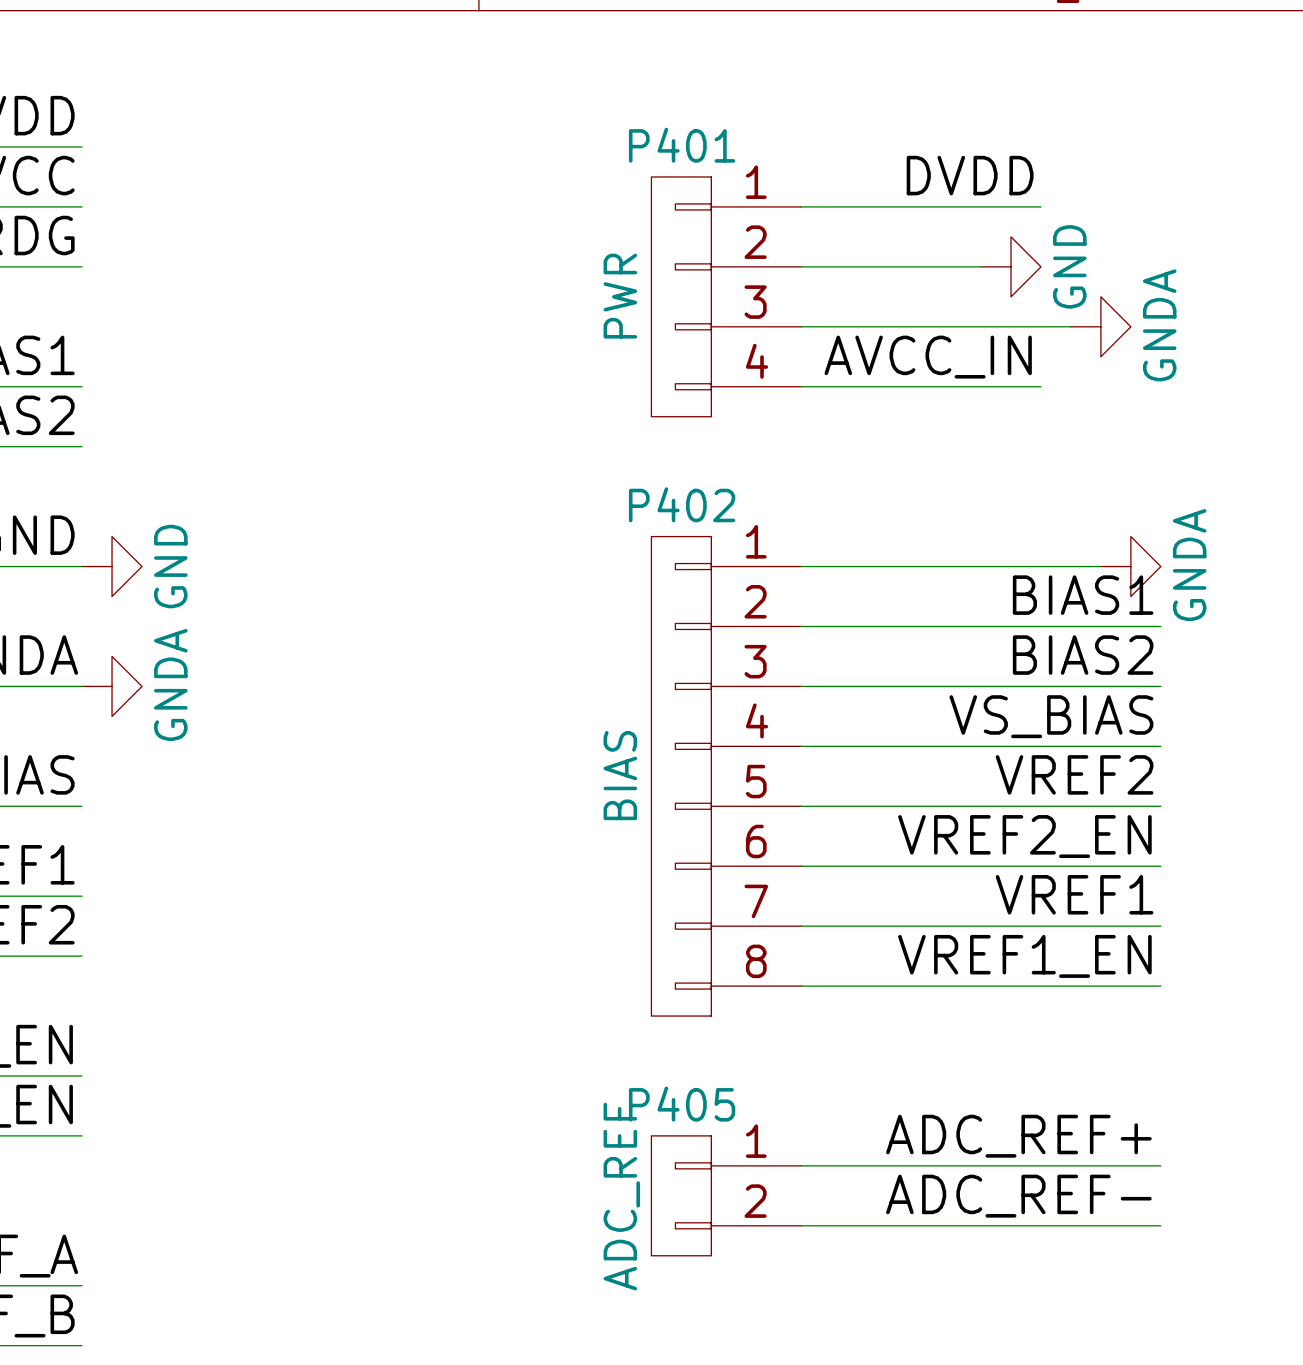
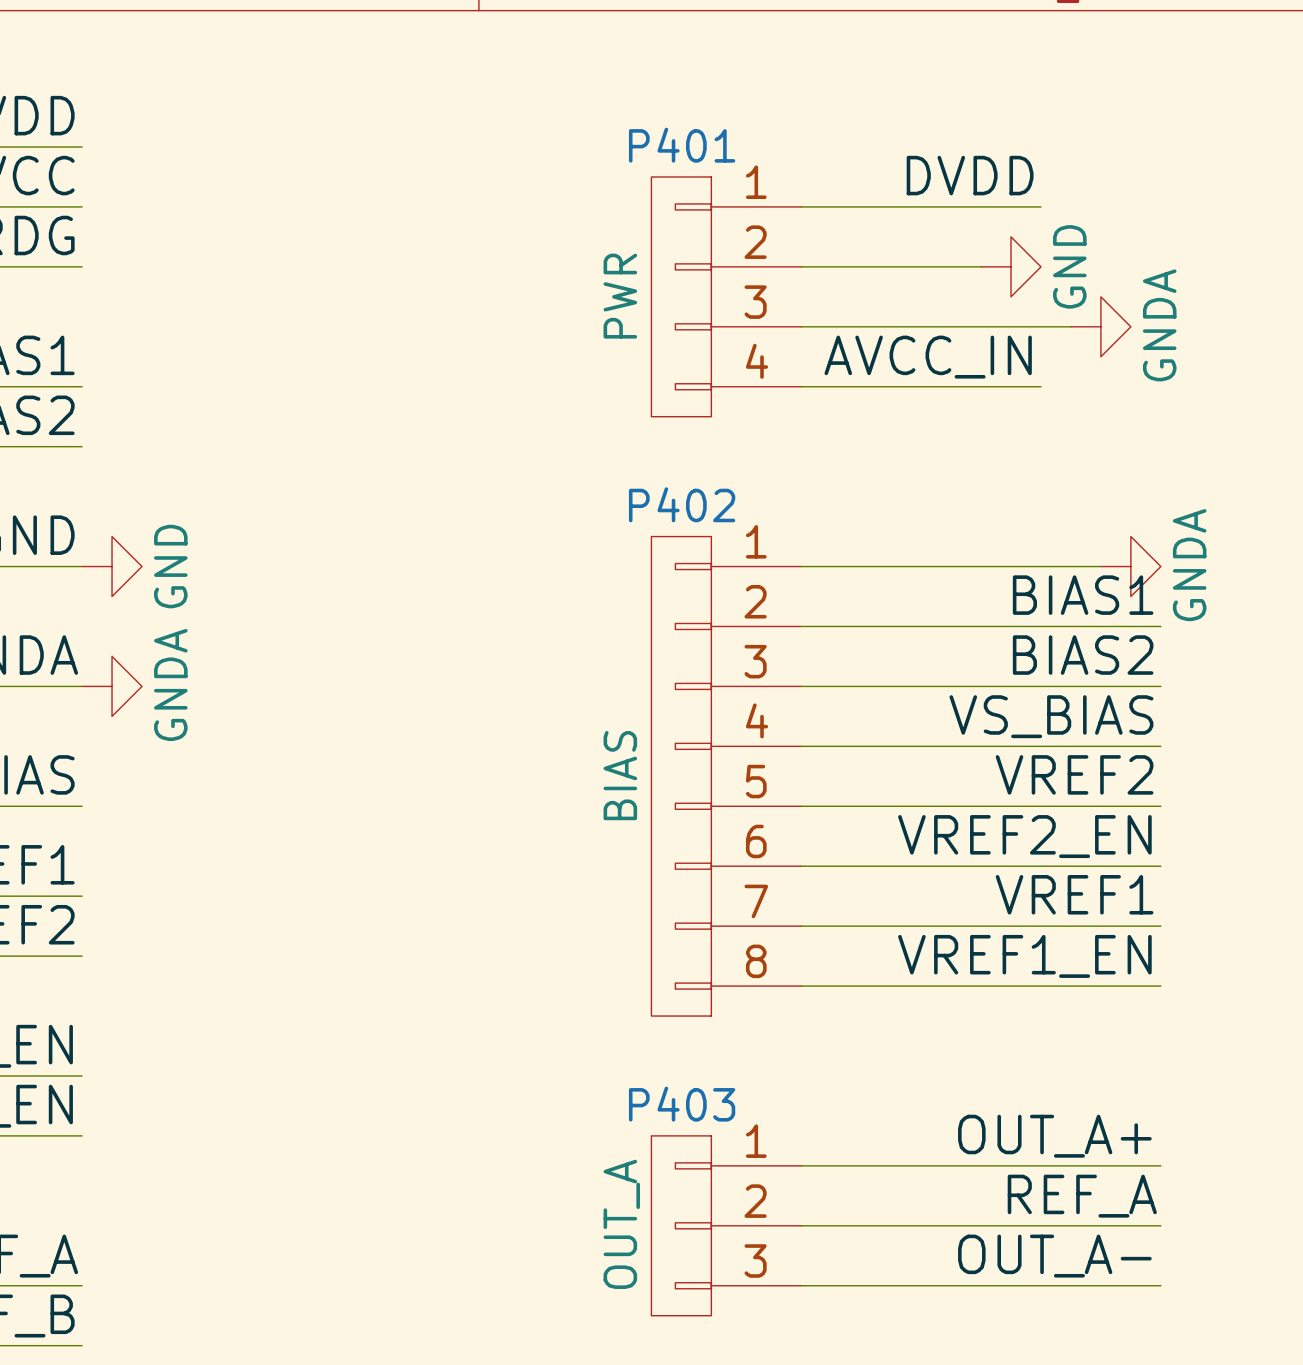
label: ADC_REF+ (1018, 1136) -> OUT_A+ (1054, 1136)
P405: ADC_REF (726, 1195) -> none
label: ADC_REF- (1018, 1196) -> REF_A (1082, 1196)
P403: none -> OUT_A (726, 1225)
label: none -> OUT_A- (1054, 1256)
wire: none -> (801, 1285) (1160, 1285)

